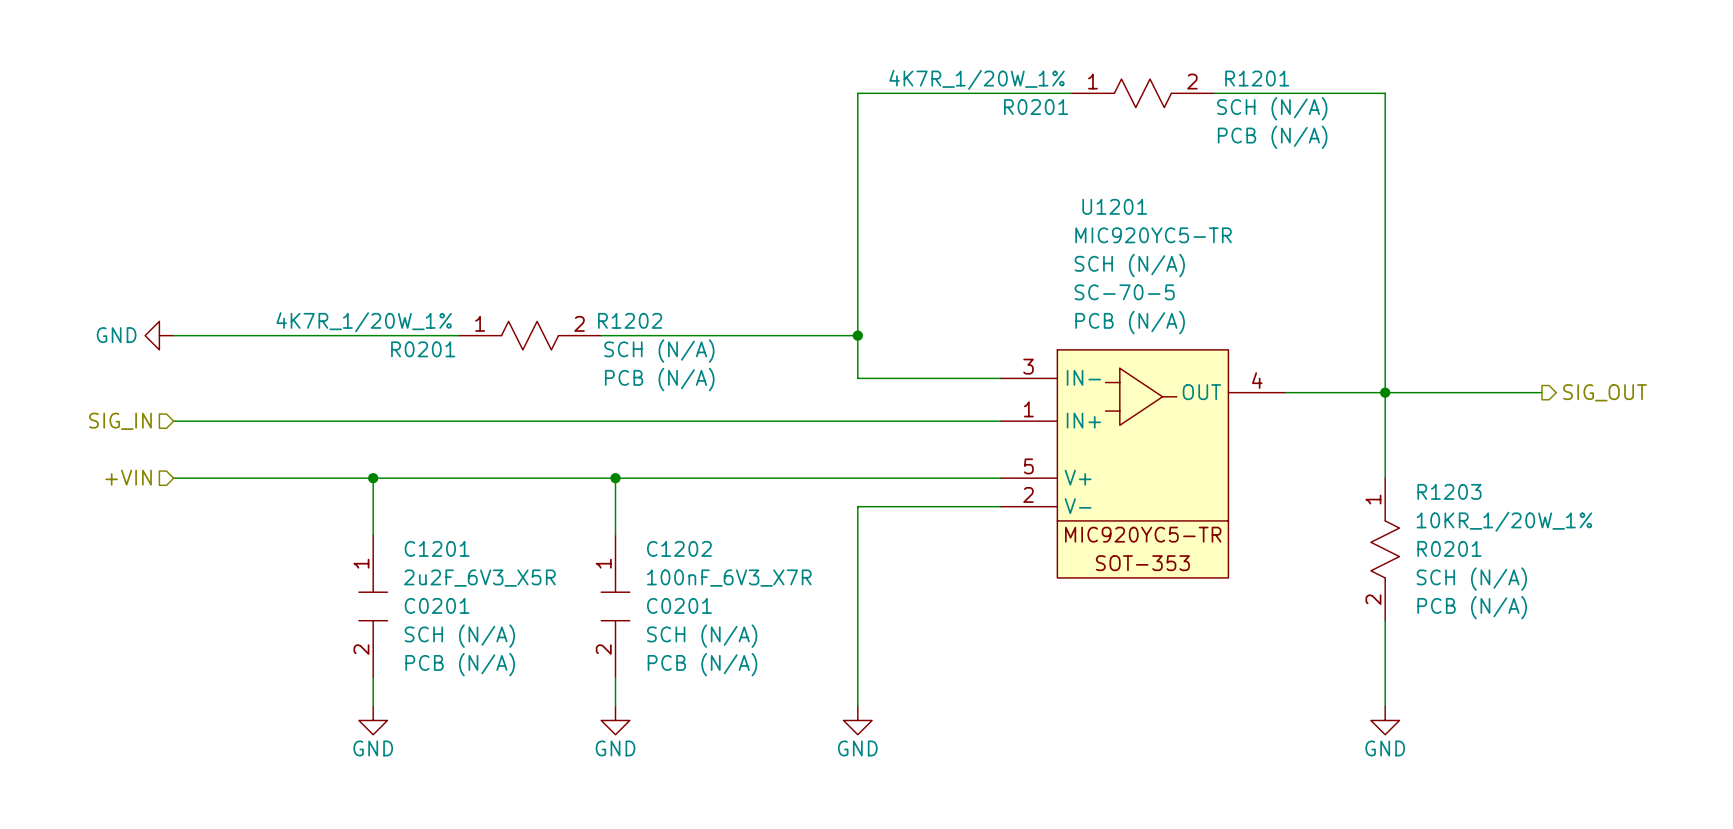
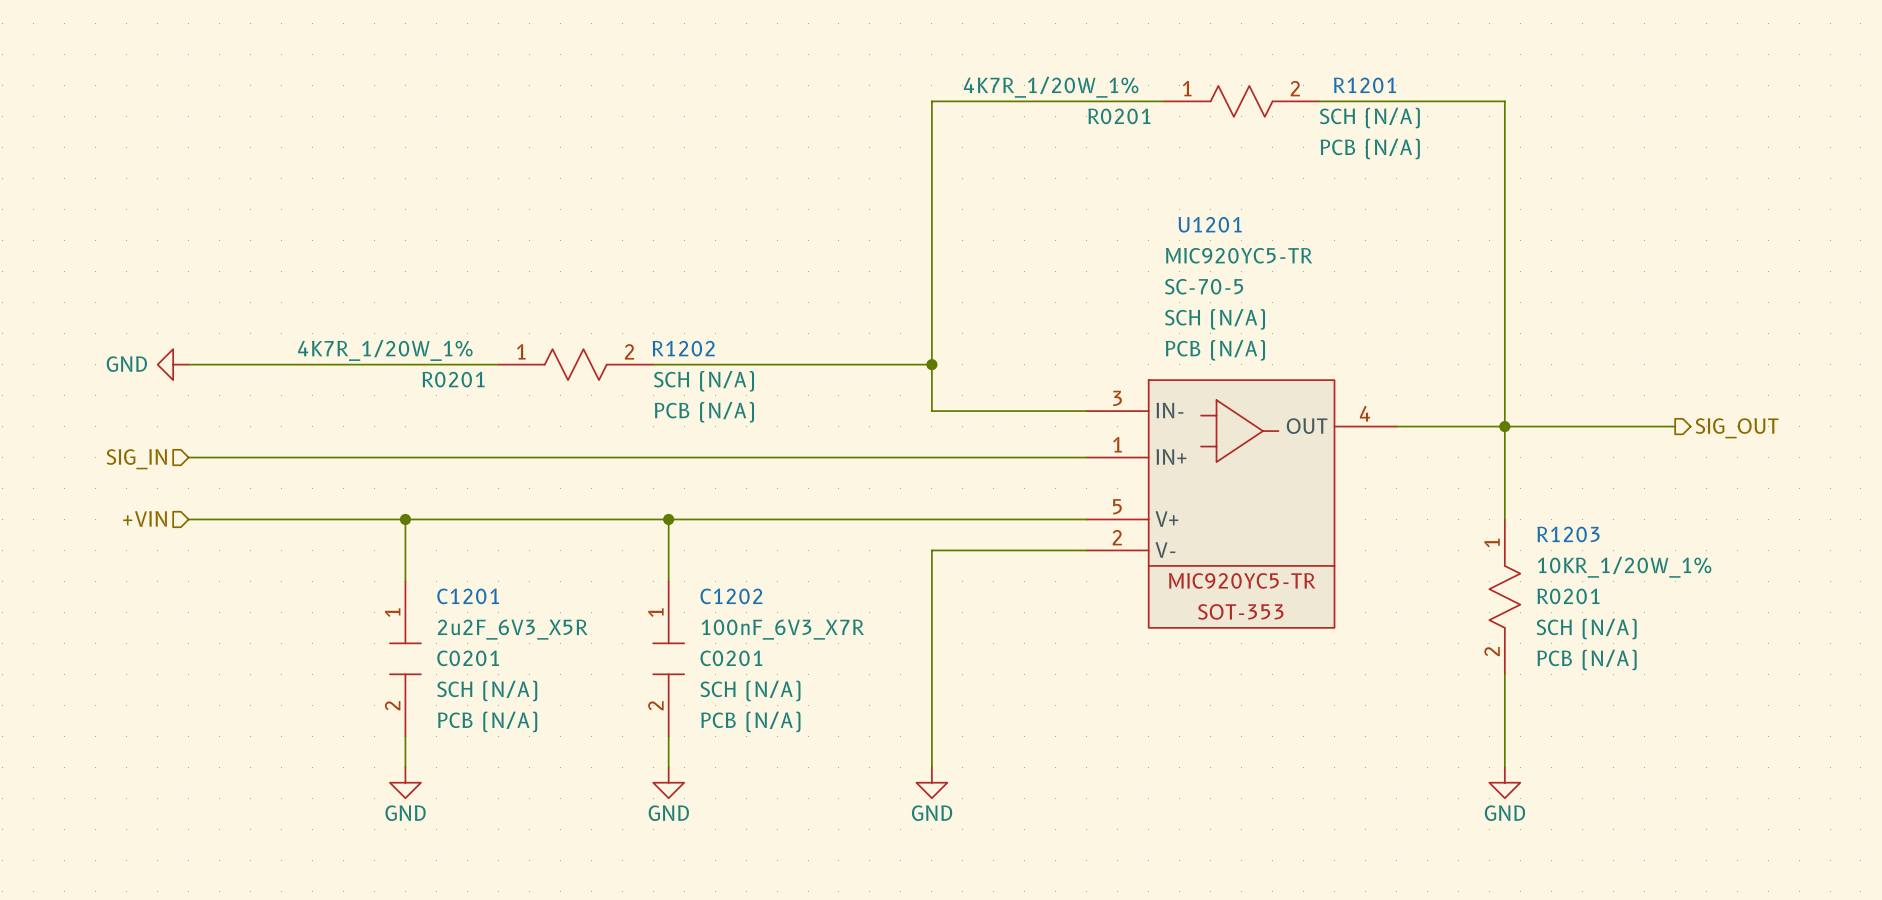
U1201 text position: SCH (N/A) (1129, 265) -> SCH (N/A) (1215, 319)
U1201 text position: SC-70-5 (1124, 292) -> SC-70-5 (1204, 286)

